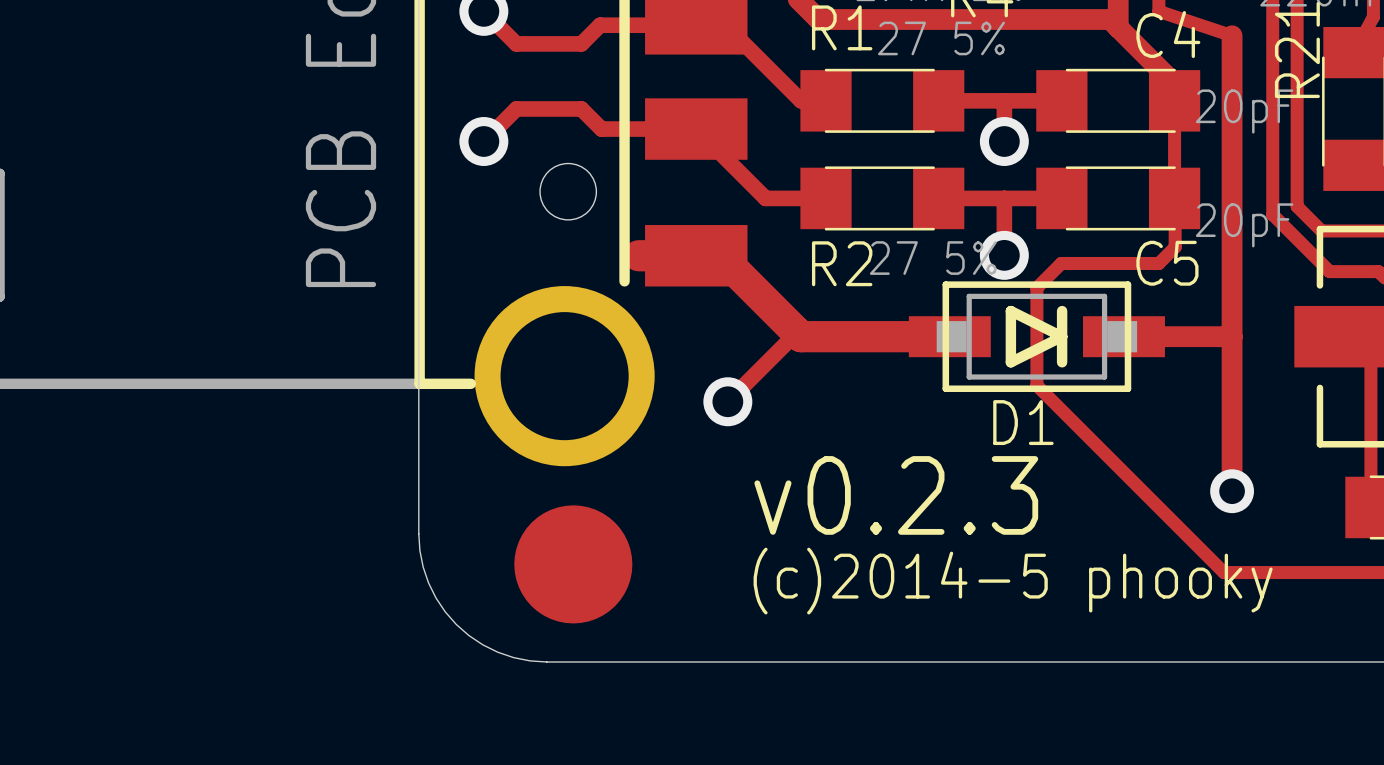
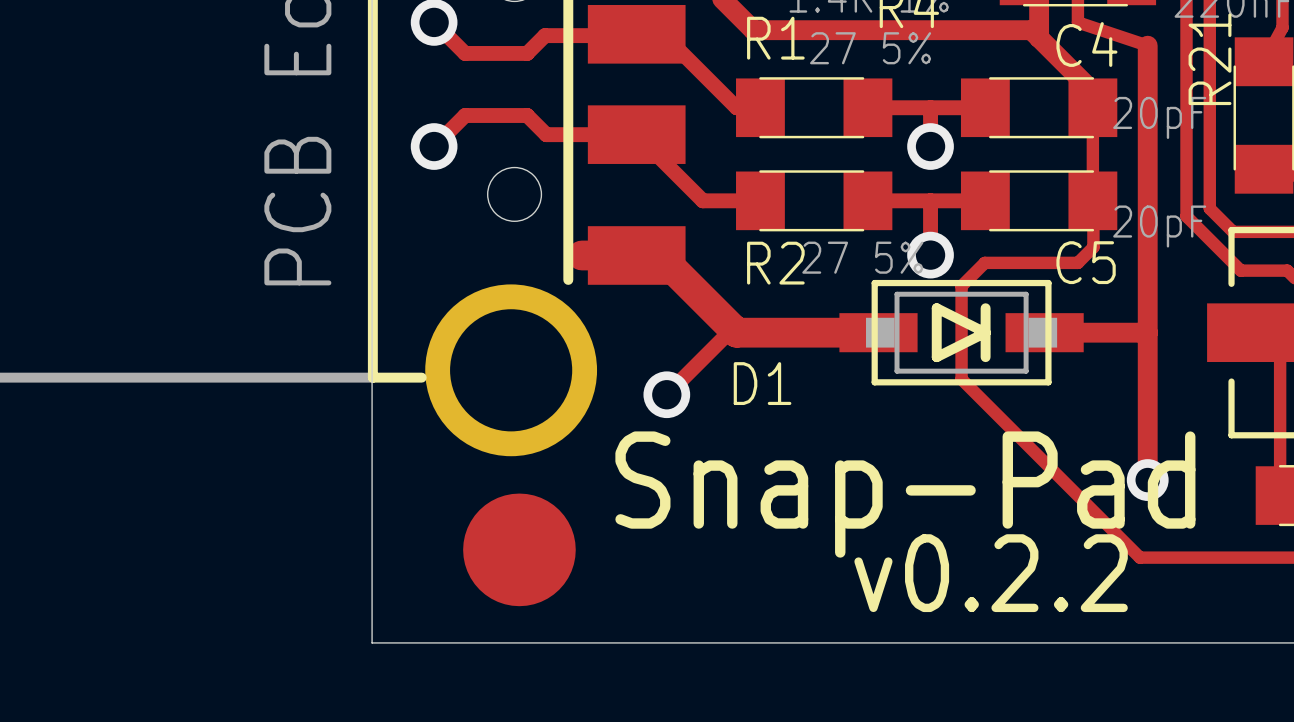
text position: D1 (1023, 422) -> D1 (762, 383)
text: v0.2.3 (896, 495) -> v0.2.2 (991, 573)
text: none -> Snap-Pad (905, 494)
board edge: (418, 533) (419, 550) (428, 582) (435, 597) (456, 624) (482, 644) (497, 652) (530, 660) (546, 662) -> (372, 520) (372, 642) (494, 642)
text: (c)2014-5 phooky (1013, 581) -> none

